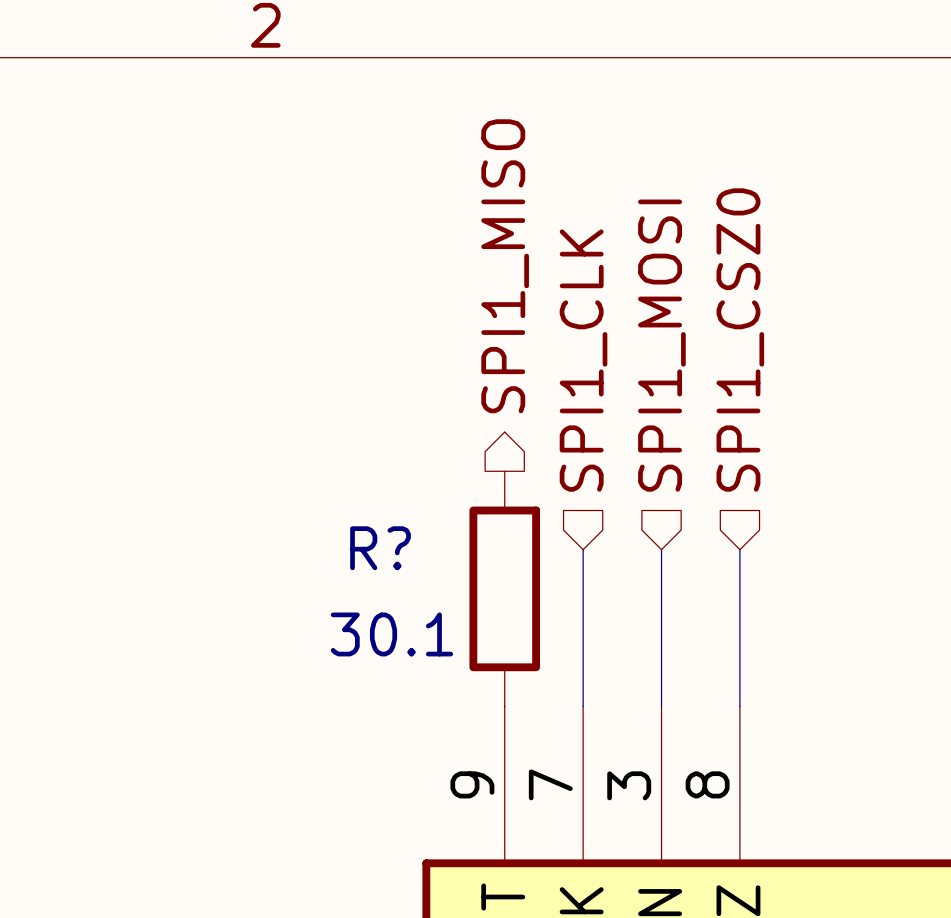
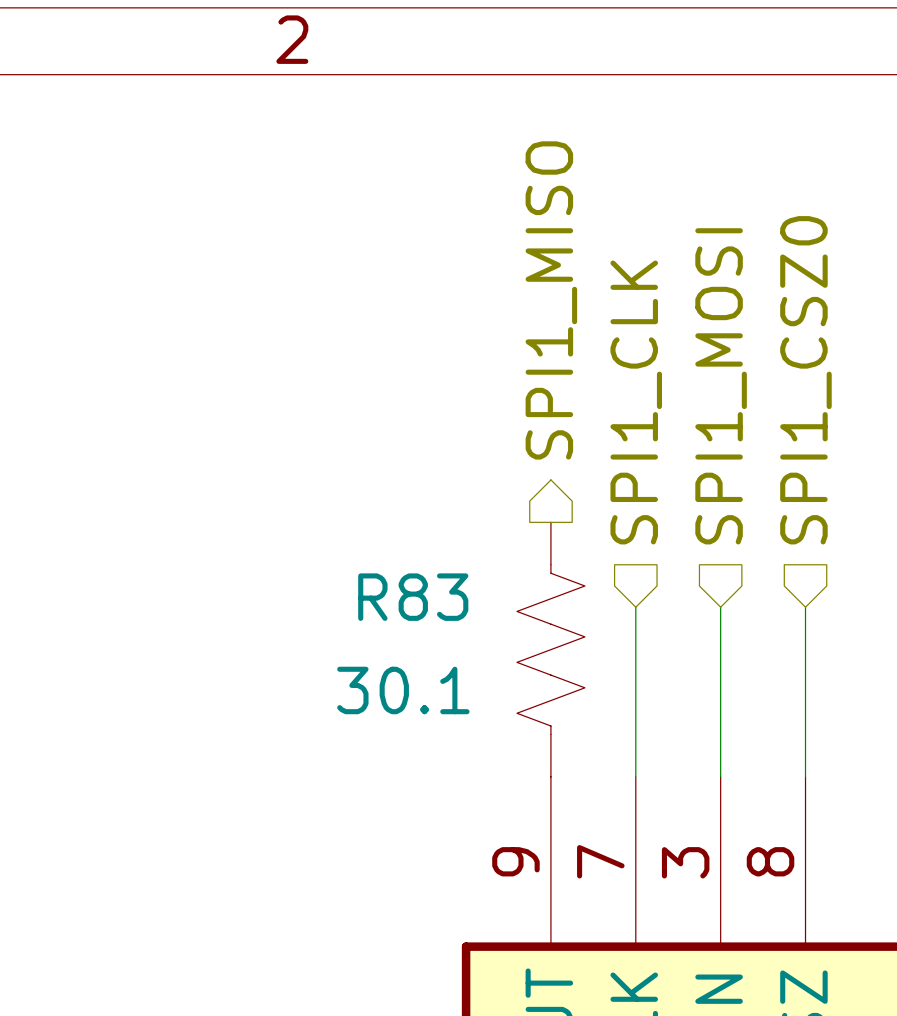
R?: 30.1 (504, 588) -> none
R83: none -> 30.1 (550, 649)

